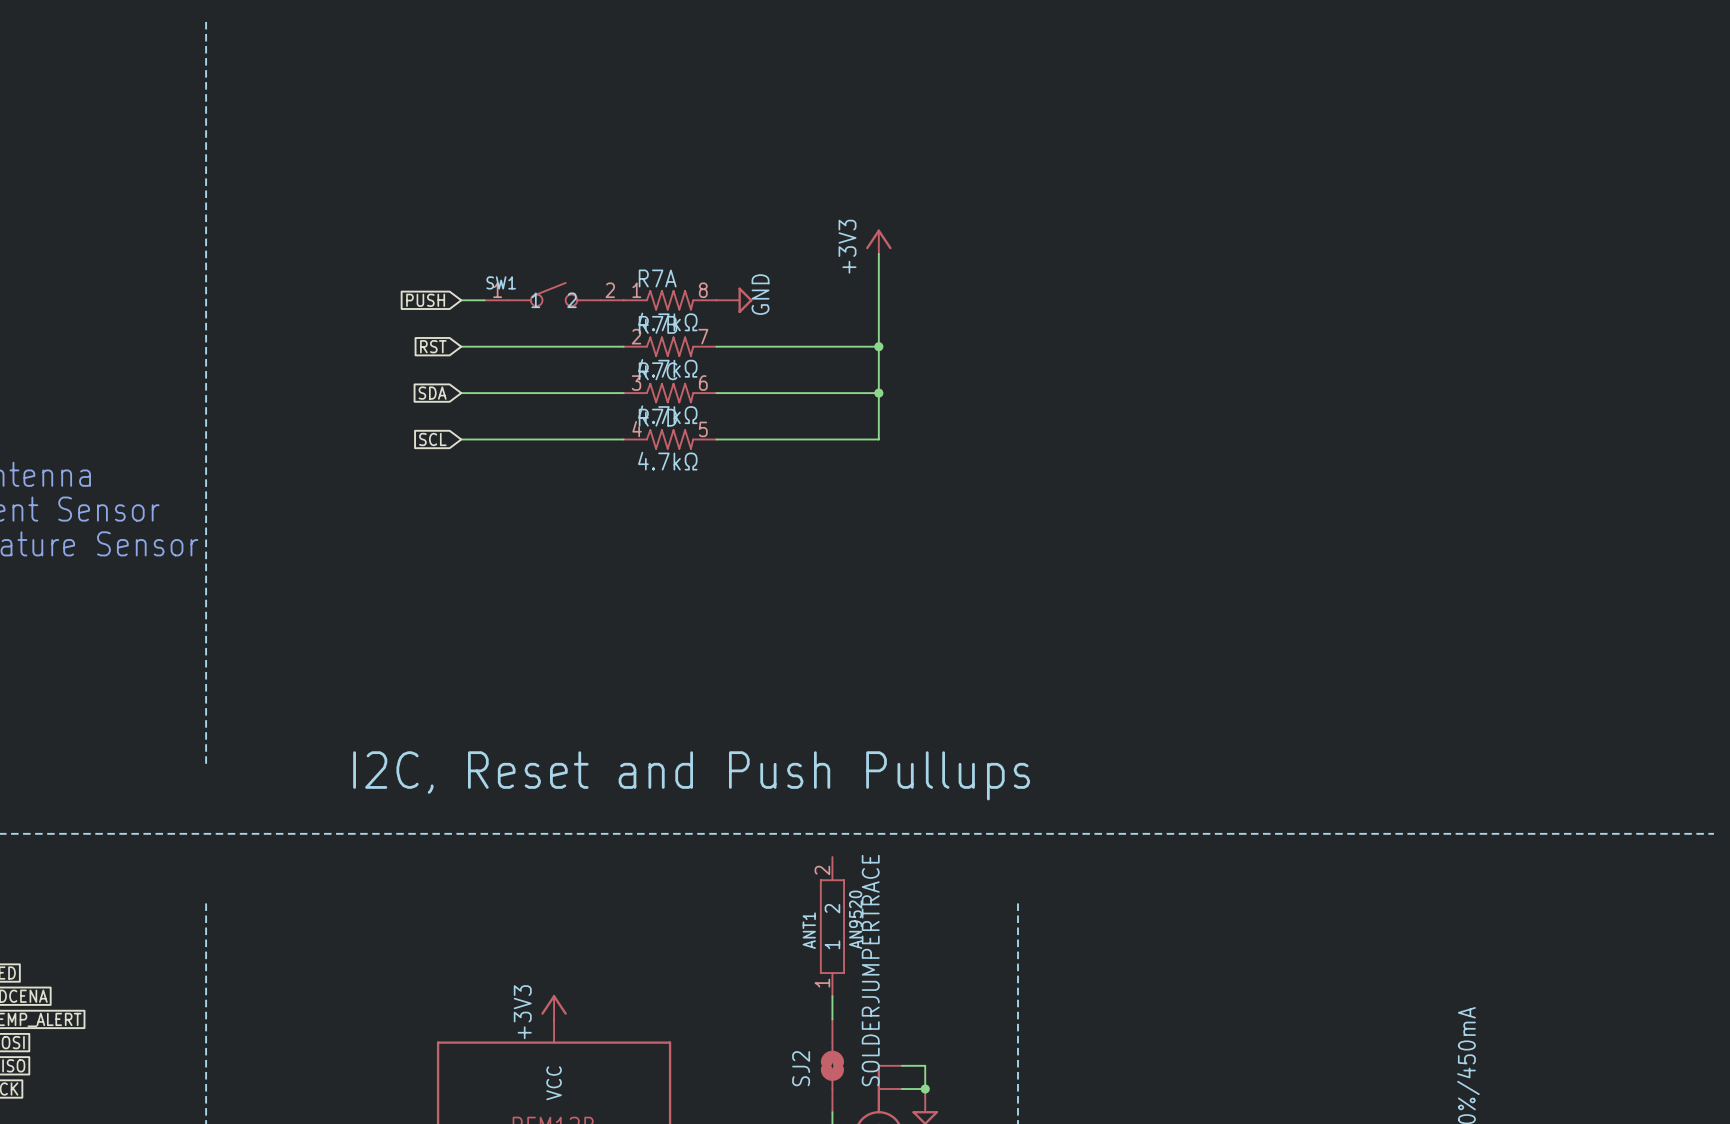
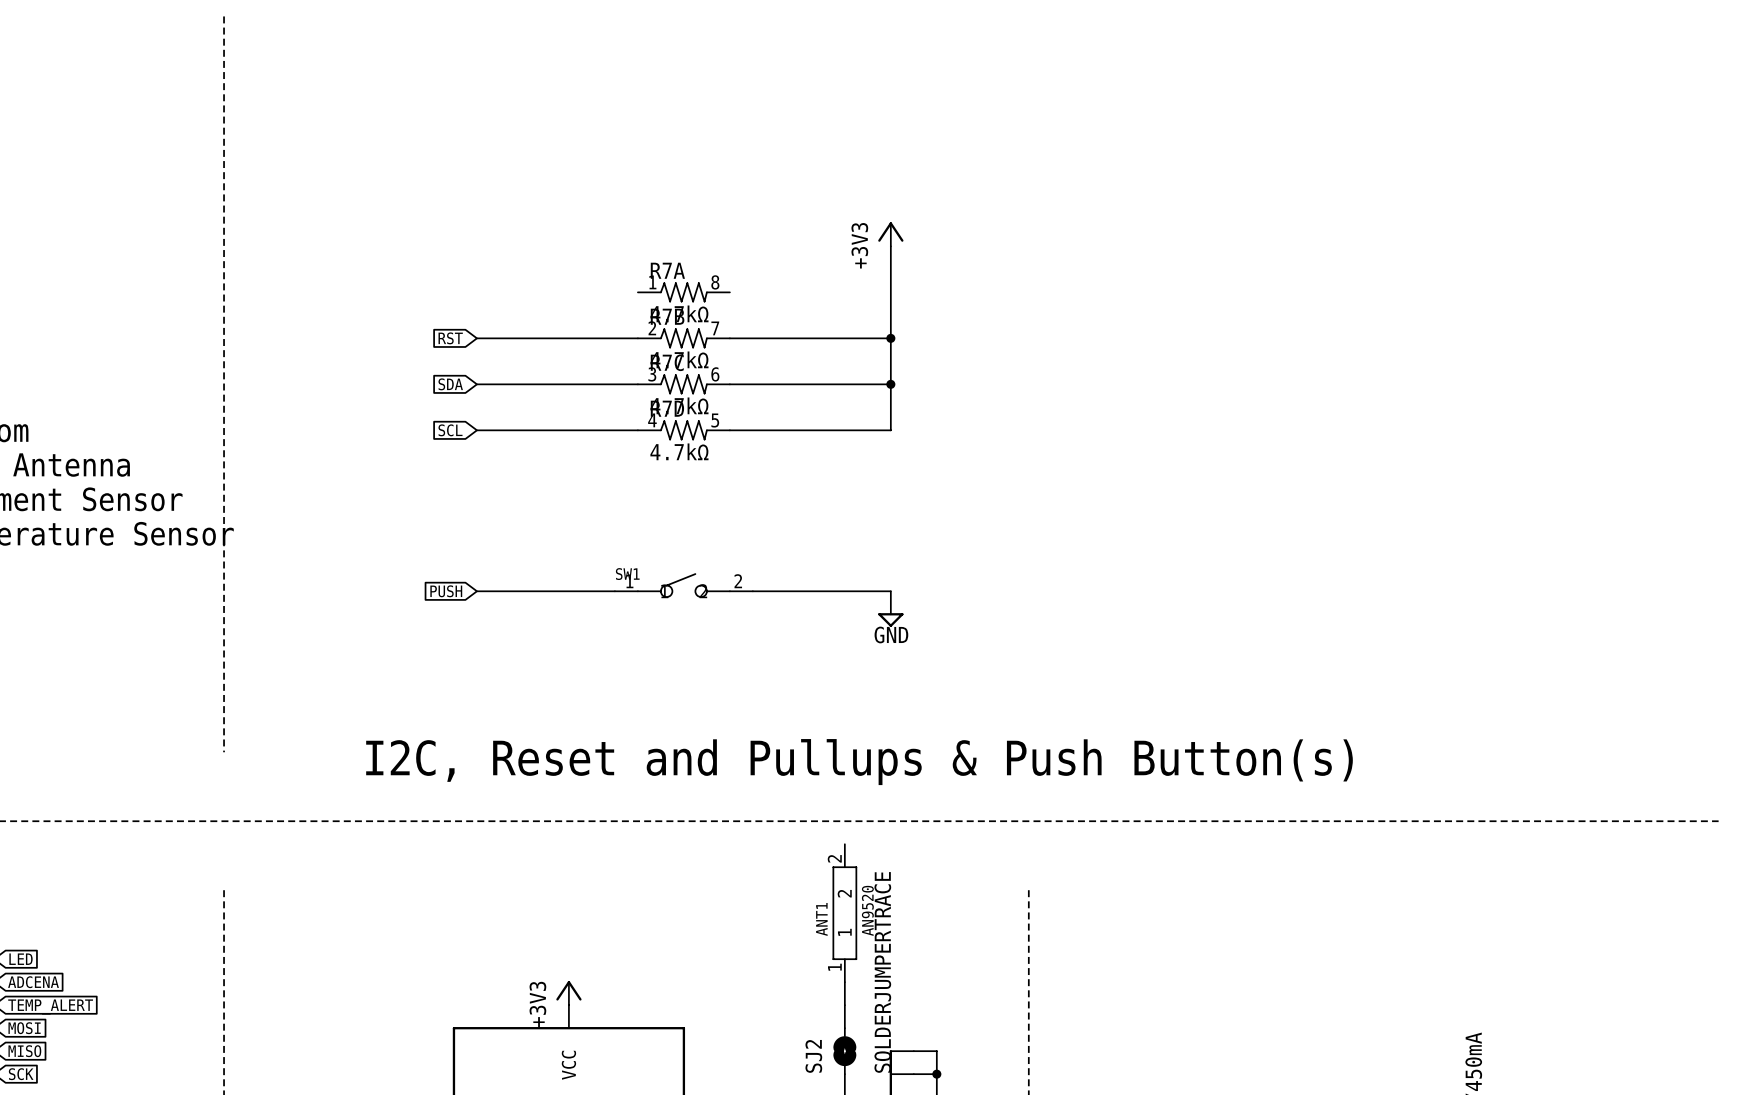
SW1 position: (554, 294) -> (683, 585)
global label: PUSH (425, 300) -> none
wire: (461, 300) (484, 300) -> none
power symbol: GND (734, 300) -> none
global label: none -> PUSH (446, 591)
wire: none -> (476, 591) (614, 591)
wire: none -> (752, 591) (890, 591)
power symbol: none -> GND (890, 609)
text: I2C, Reset and Push Pullups (691, 775) -> I2C, Reset and Pullups & Push Button(s) (859, 762)

